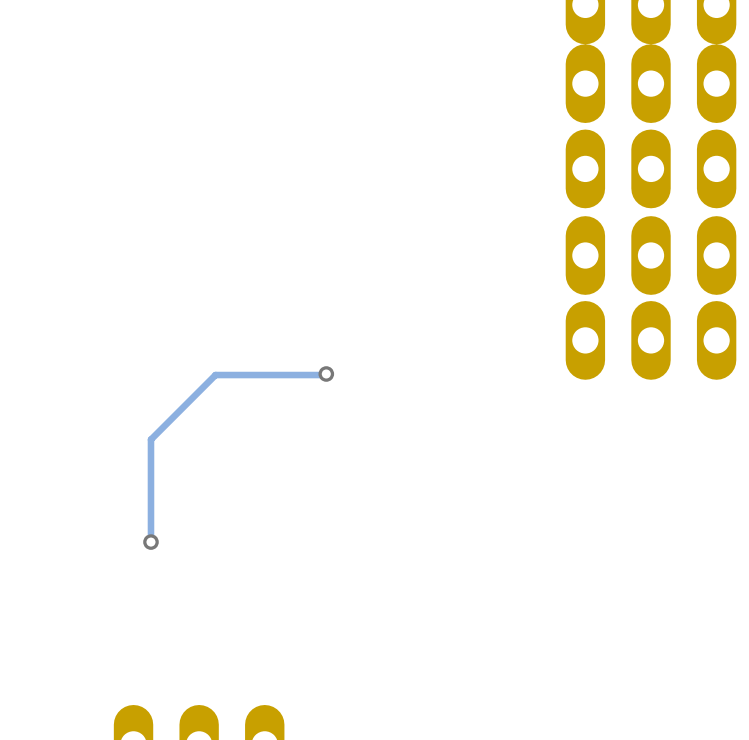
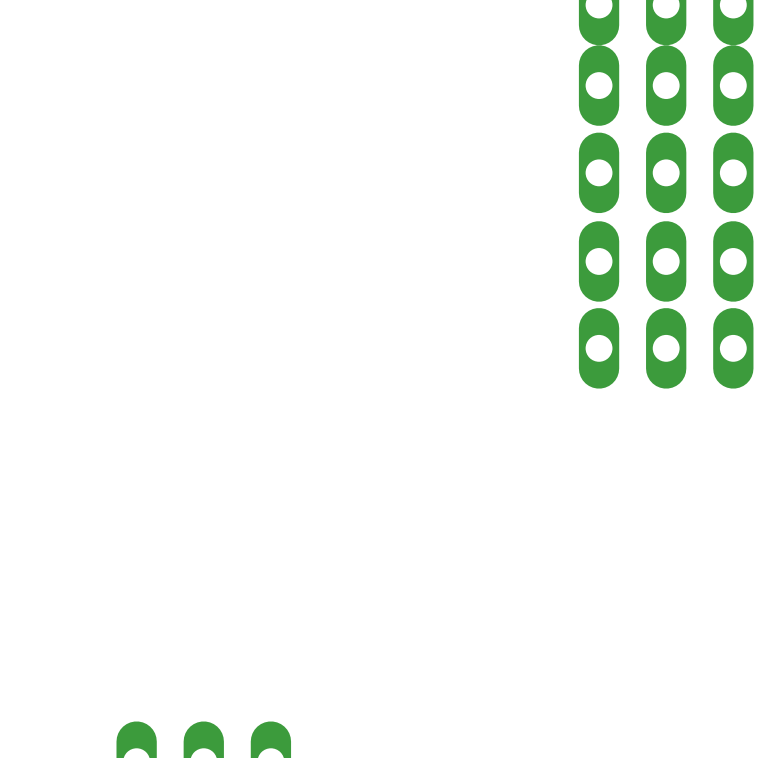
track: (326, 373) (215, 375) (150, 439) (150, 542) -> none
via: (326, 373) -> none
via: (150, 542) -> none

